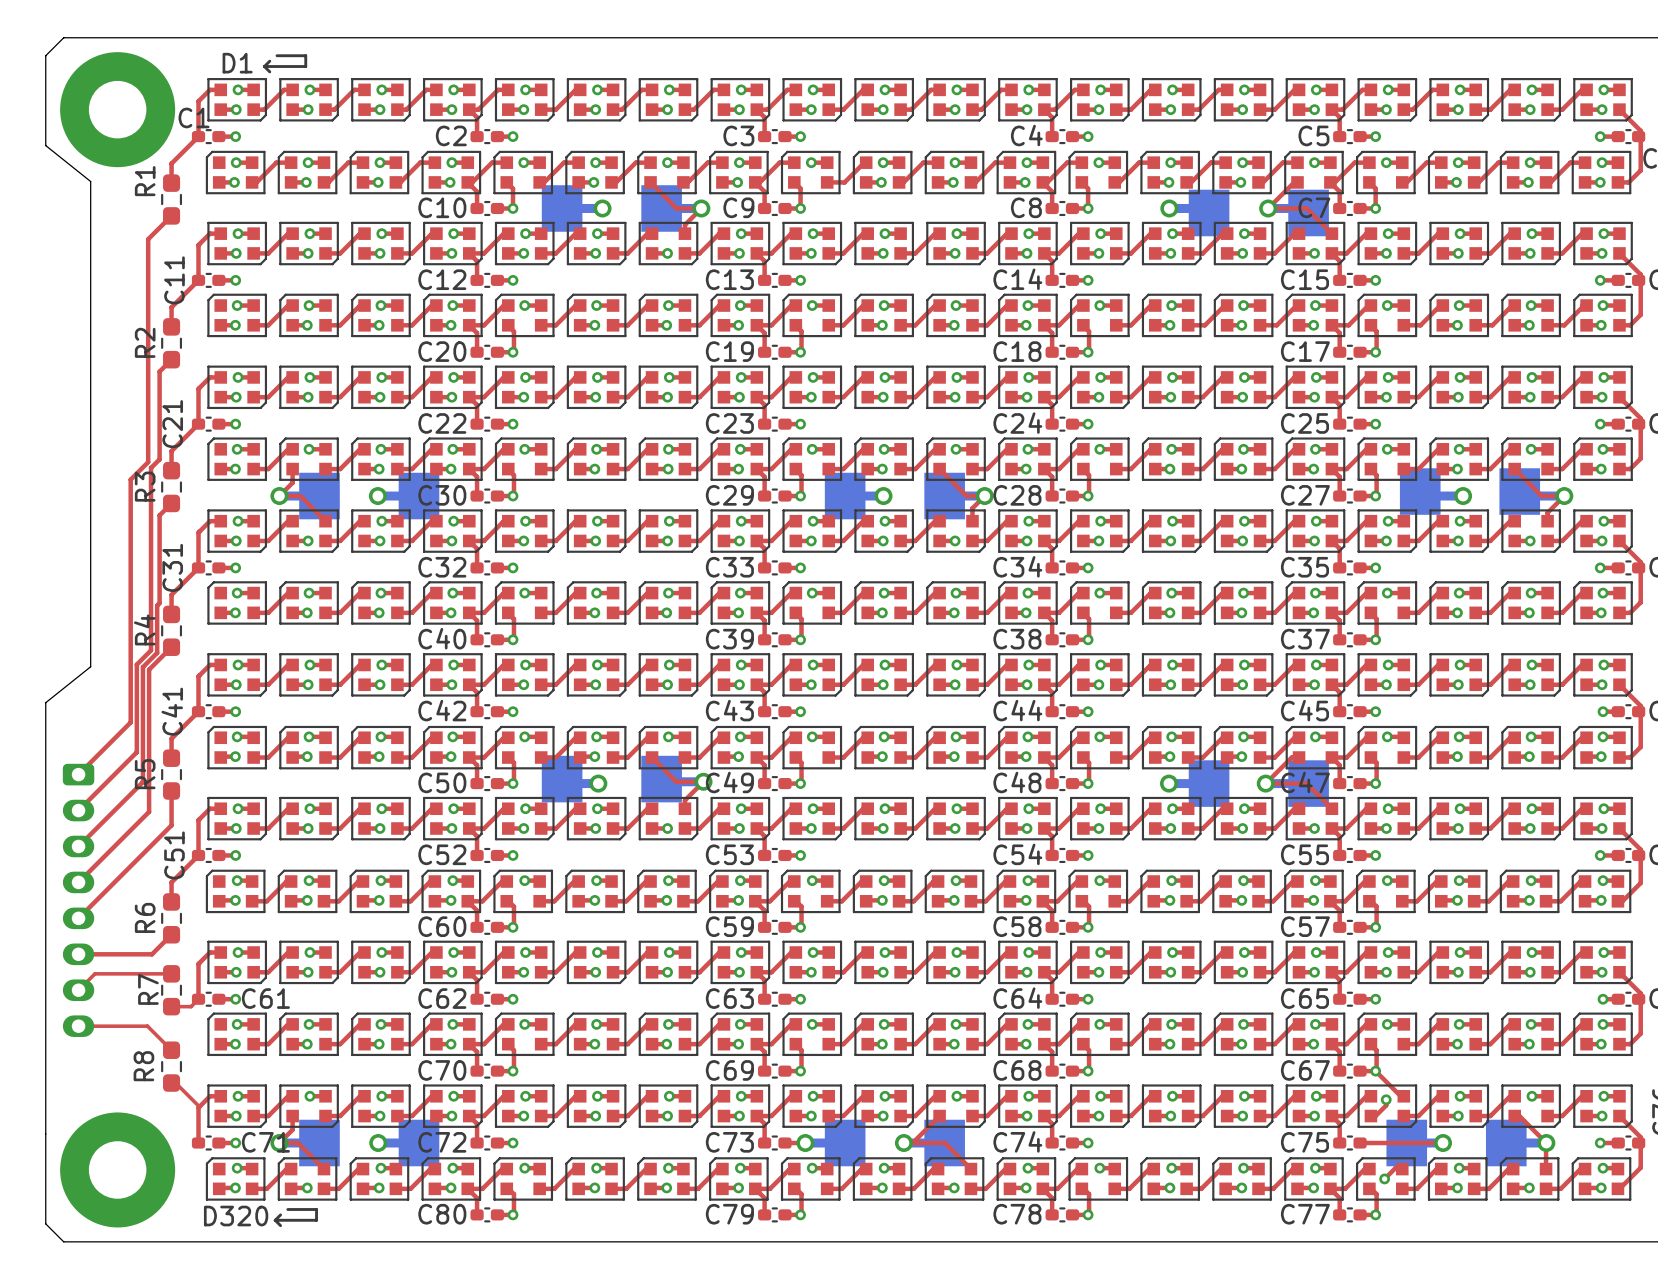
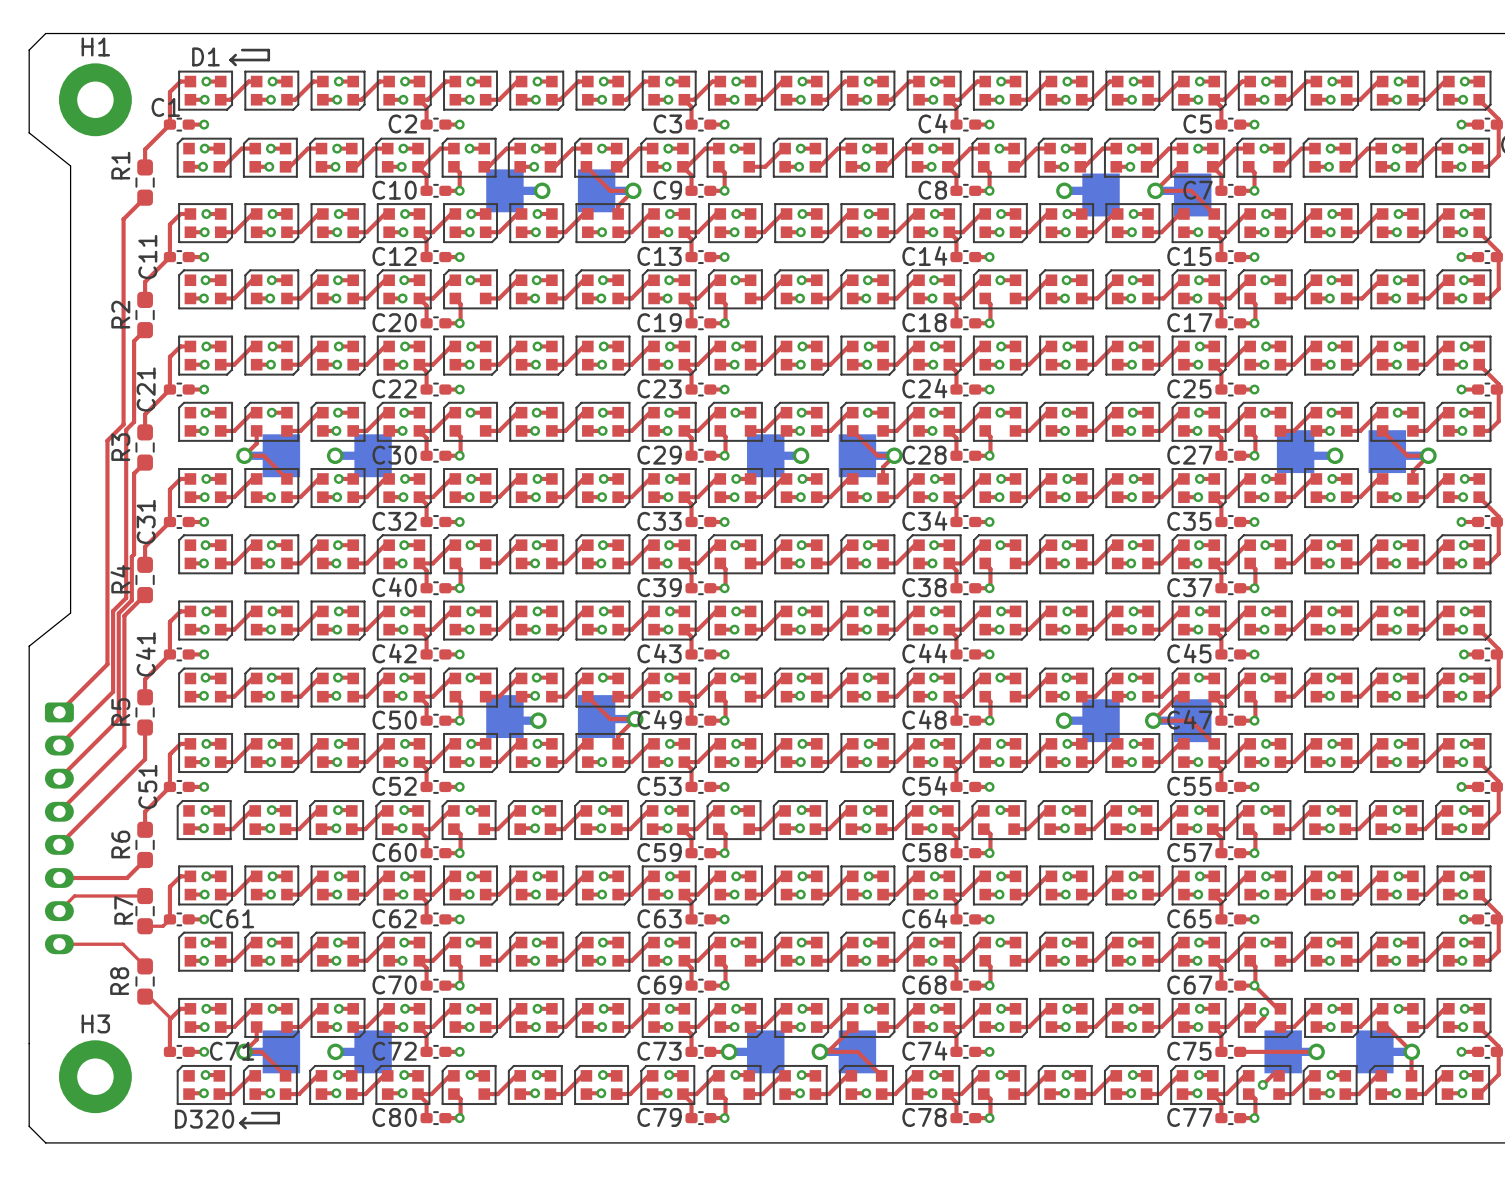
part: (117, 109) -> none
H1: none -> (95, 99)
part: (117, 1169) -> none
H3: none -> (95, 1076)

